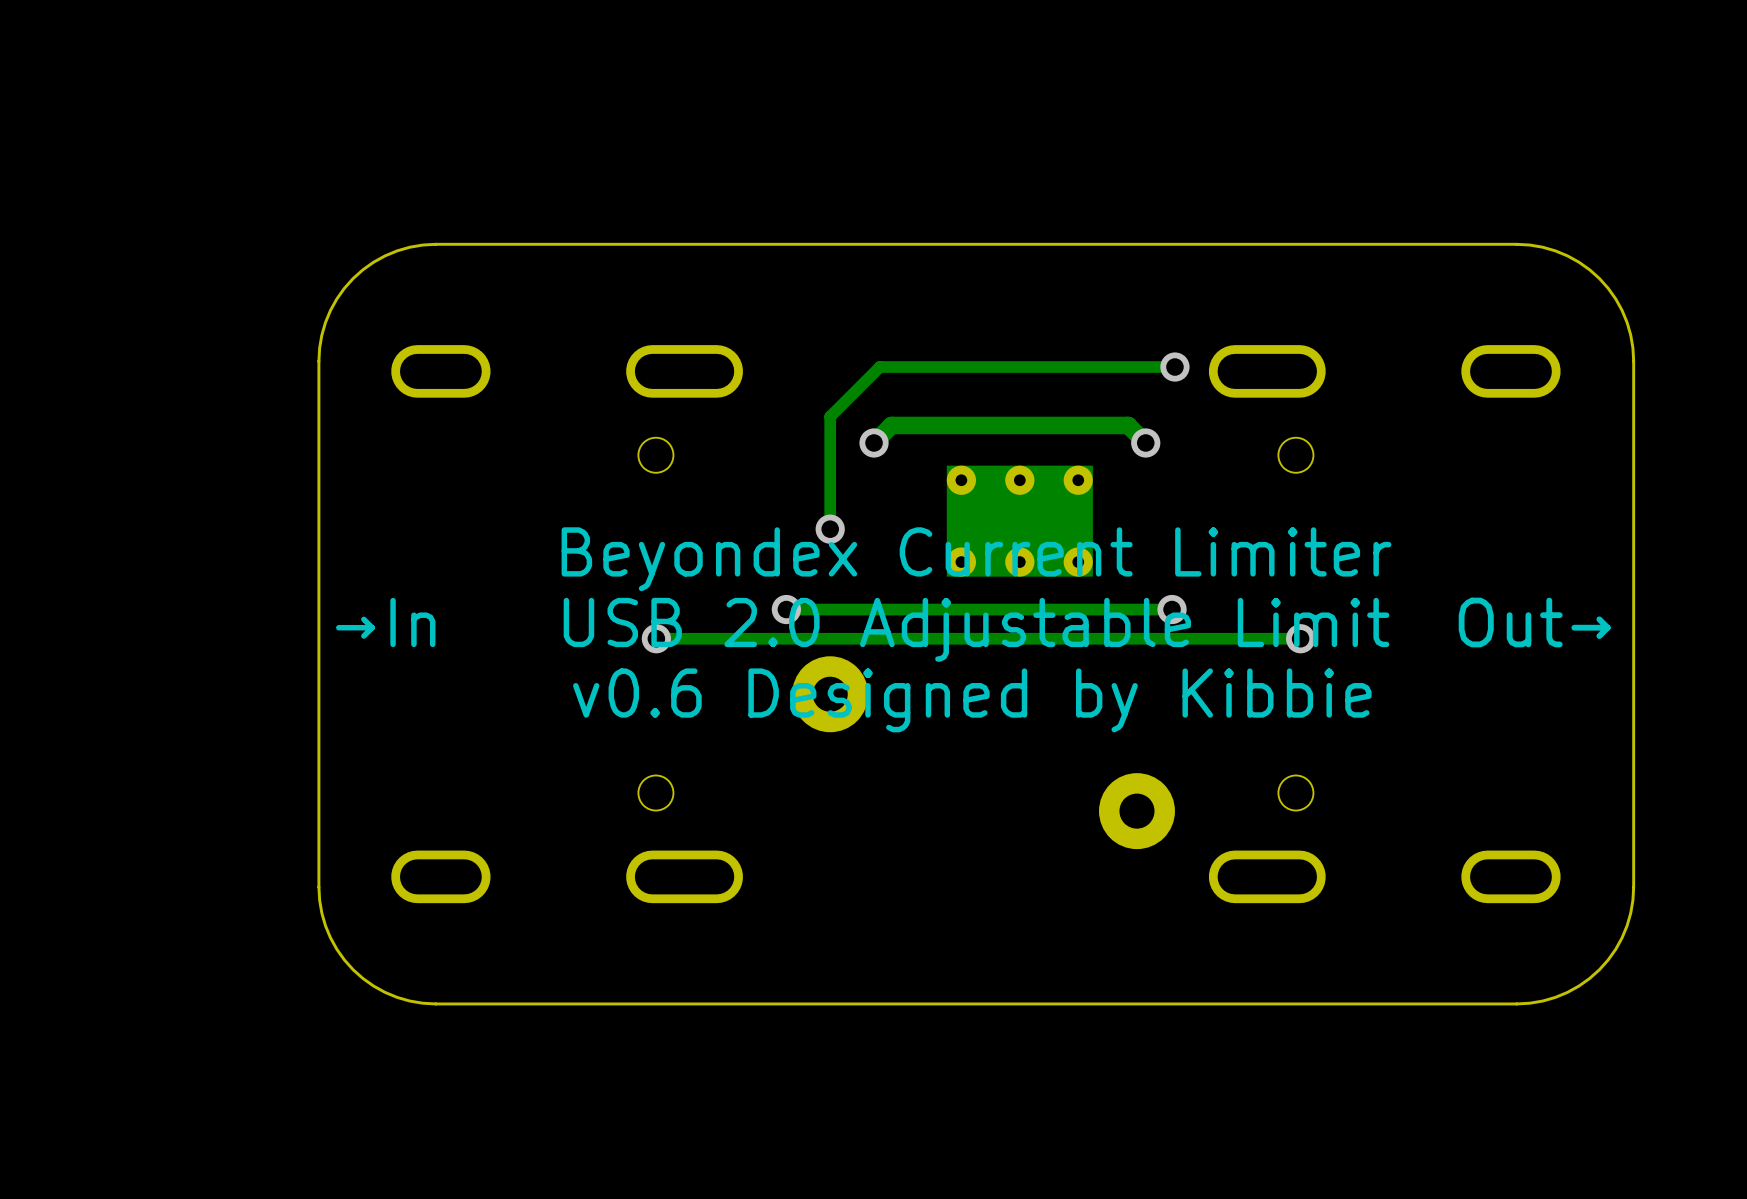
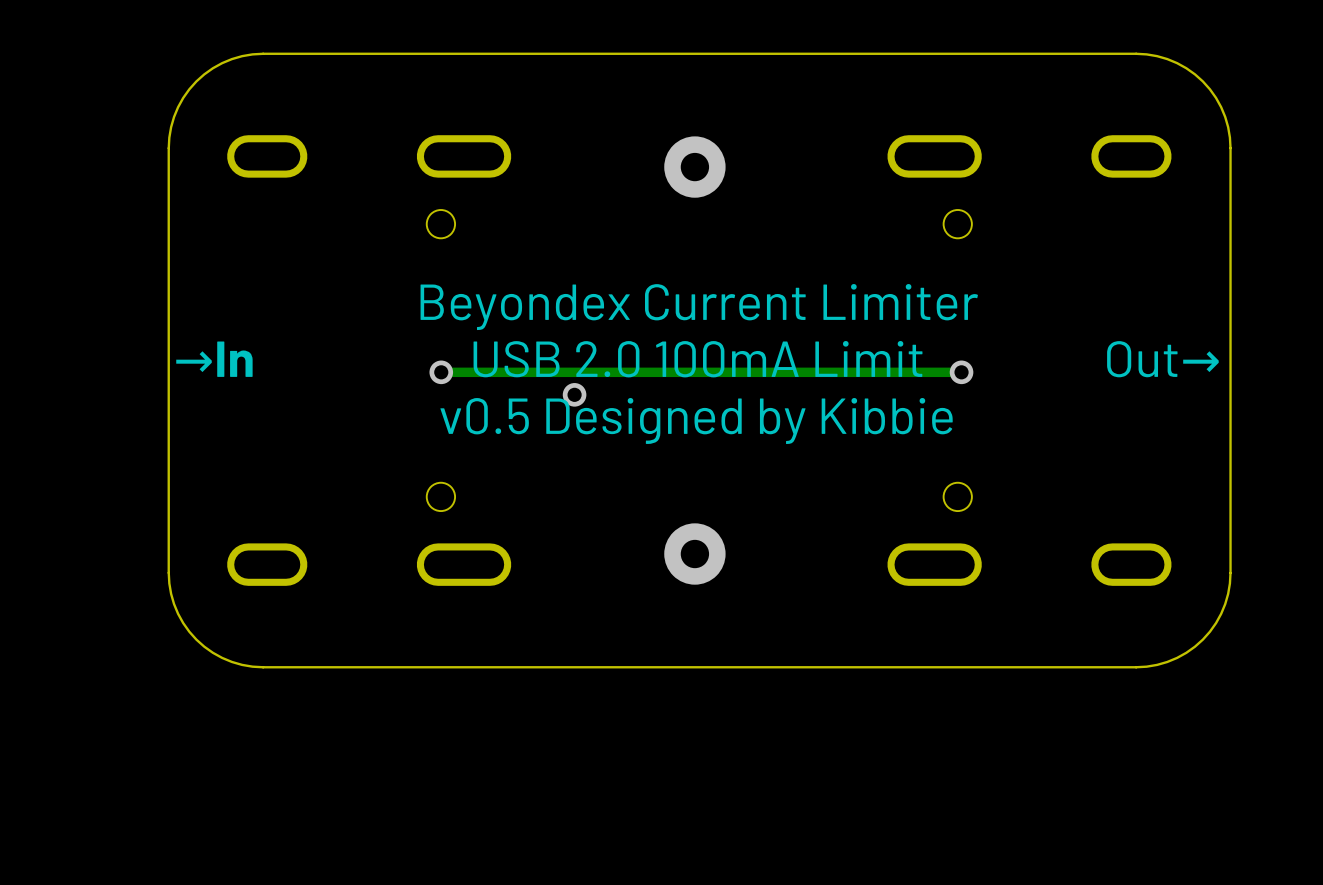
track: (1174, 367) (879, 367) (830, 416) (830, 529) -> none
via: (1174, 367) -> none
via: none -> (694, 167)
via: (874, 442) -> none
track: (1145, 442) (1128, 425) (891, 425) (874, 442) -> none
via: (1145, 442) -> none
part: (1019, 521) -> none
via: (830, 529) -> none
via position: (786, 609) -> (574, 394)
track: (1172, 609) (783, 609) -> none
via: (1172, 609) -> none
text: USB 2.0 Adjustable Limit (976, 629) -> USB 2.0 100mA Limit (698, 359)
part: (830, 694) -> none
text: v0.6 Designed by Kibbie (972, 700) -> v0.5 Designed by Kibbie (696, 420)
part: (1136, 811) -> none
via: none -> (694, 554)

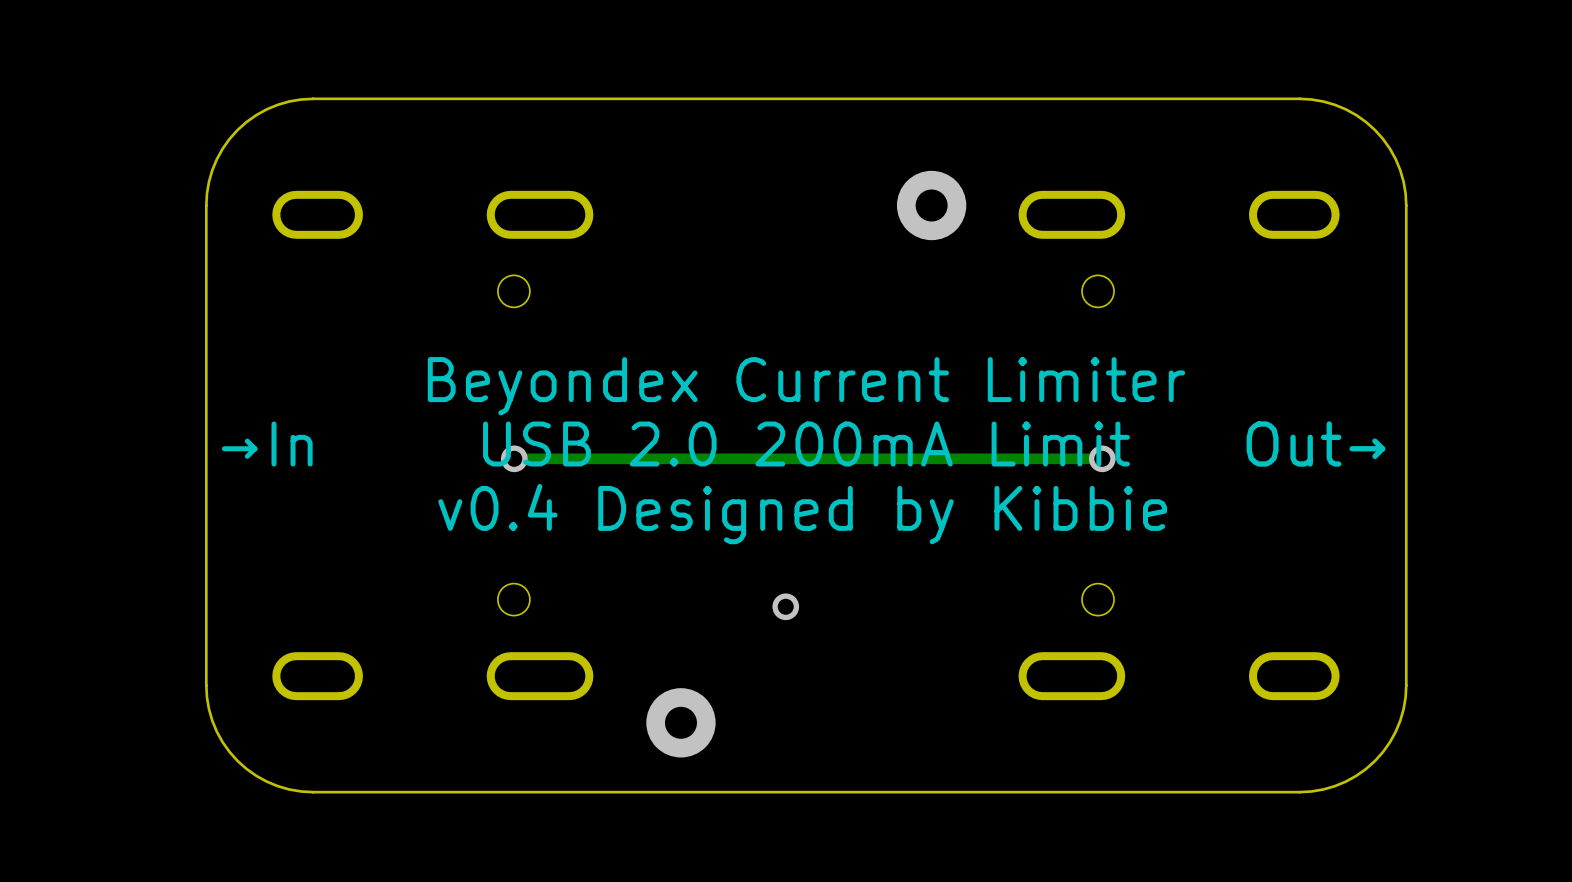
via position: (694, 167) -> (931, 205)
text: USB 2.0 100mA Limit (698, 359) -> USB 2.0 200mA Limit (806, 443)
via position: (574, 394) -> (785, 606)
text: v0.5 Designed by Kibbie (696, 420) -> v0.4 Designed by Kibbie (802, 514)
via position: (694, 554) -> (680, 722)

